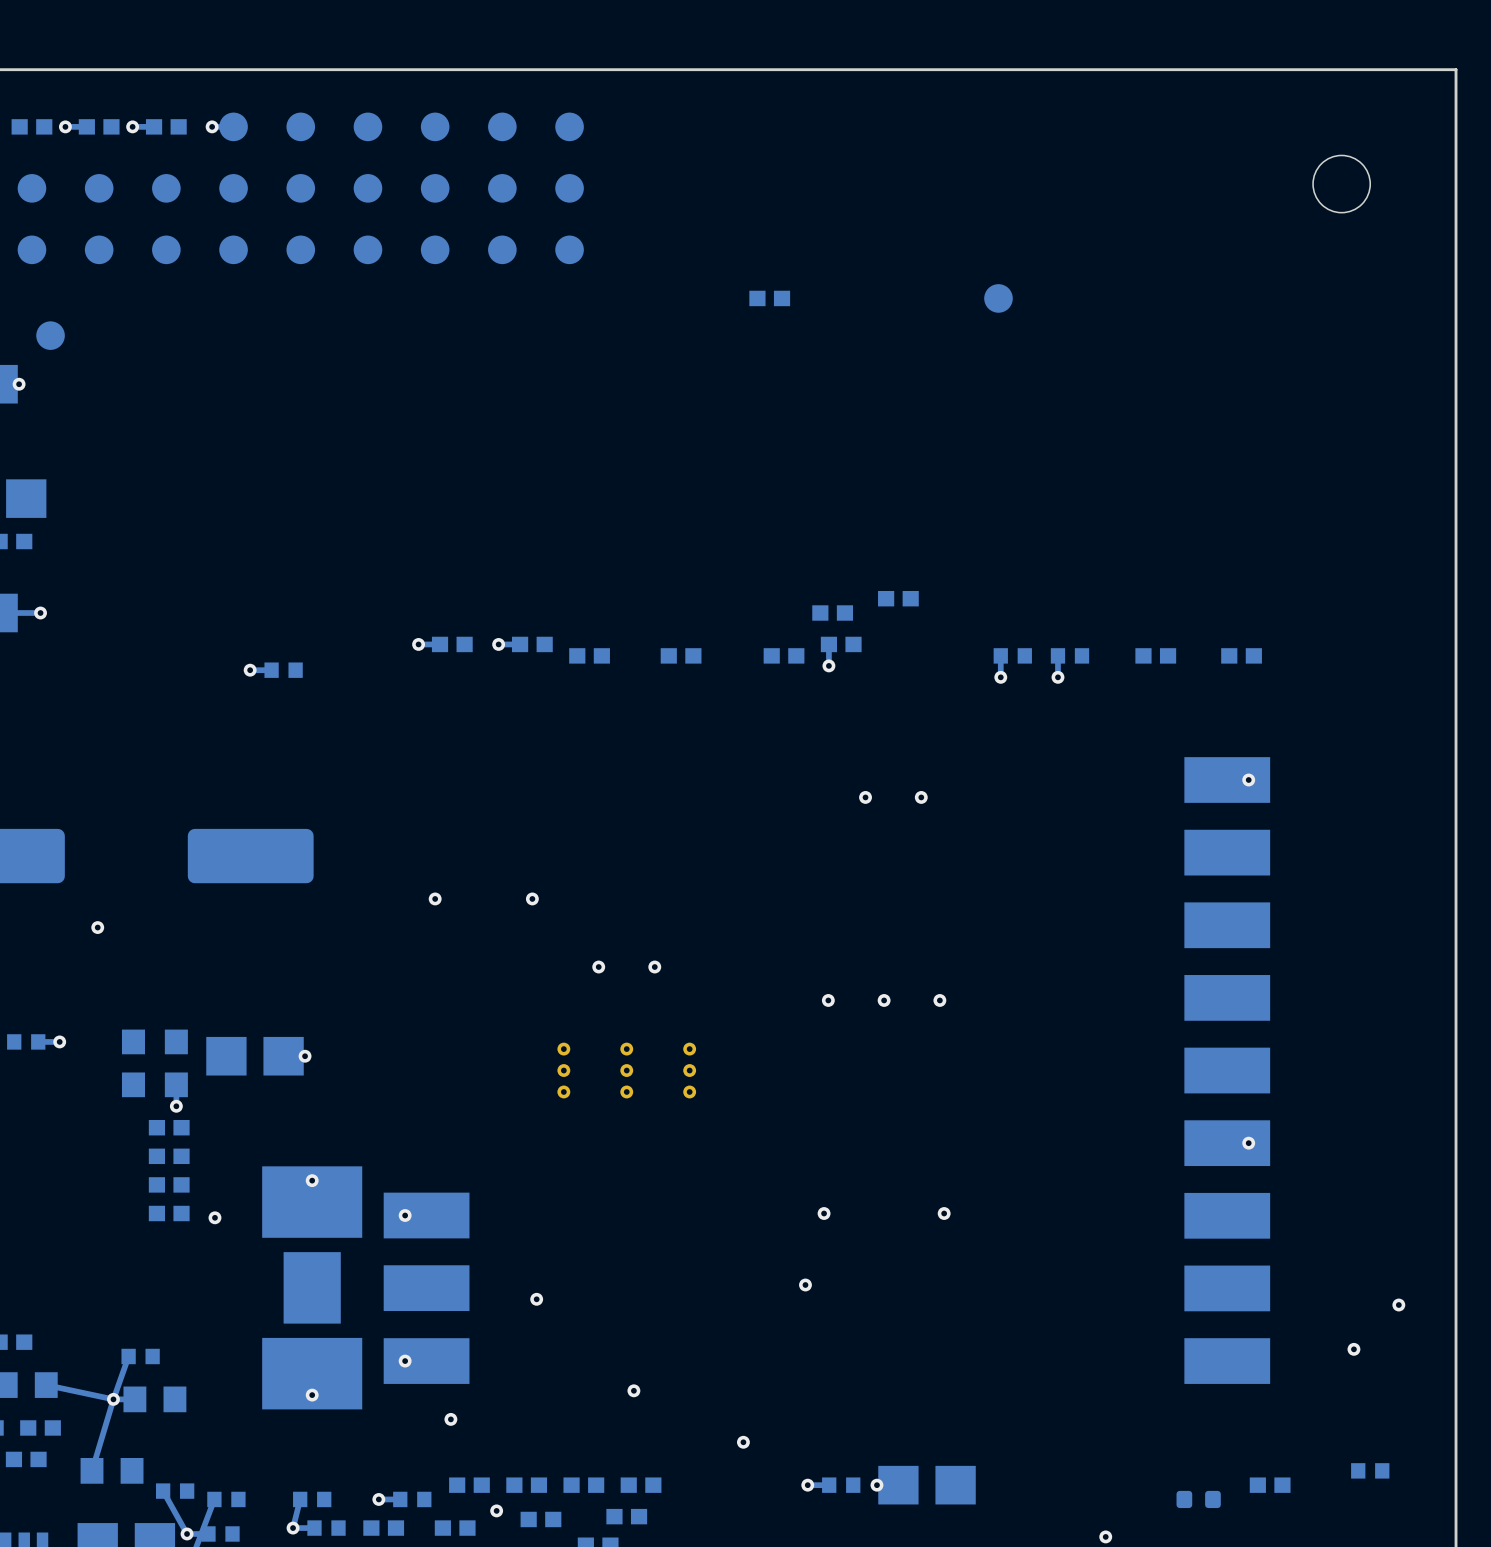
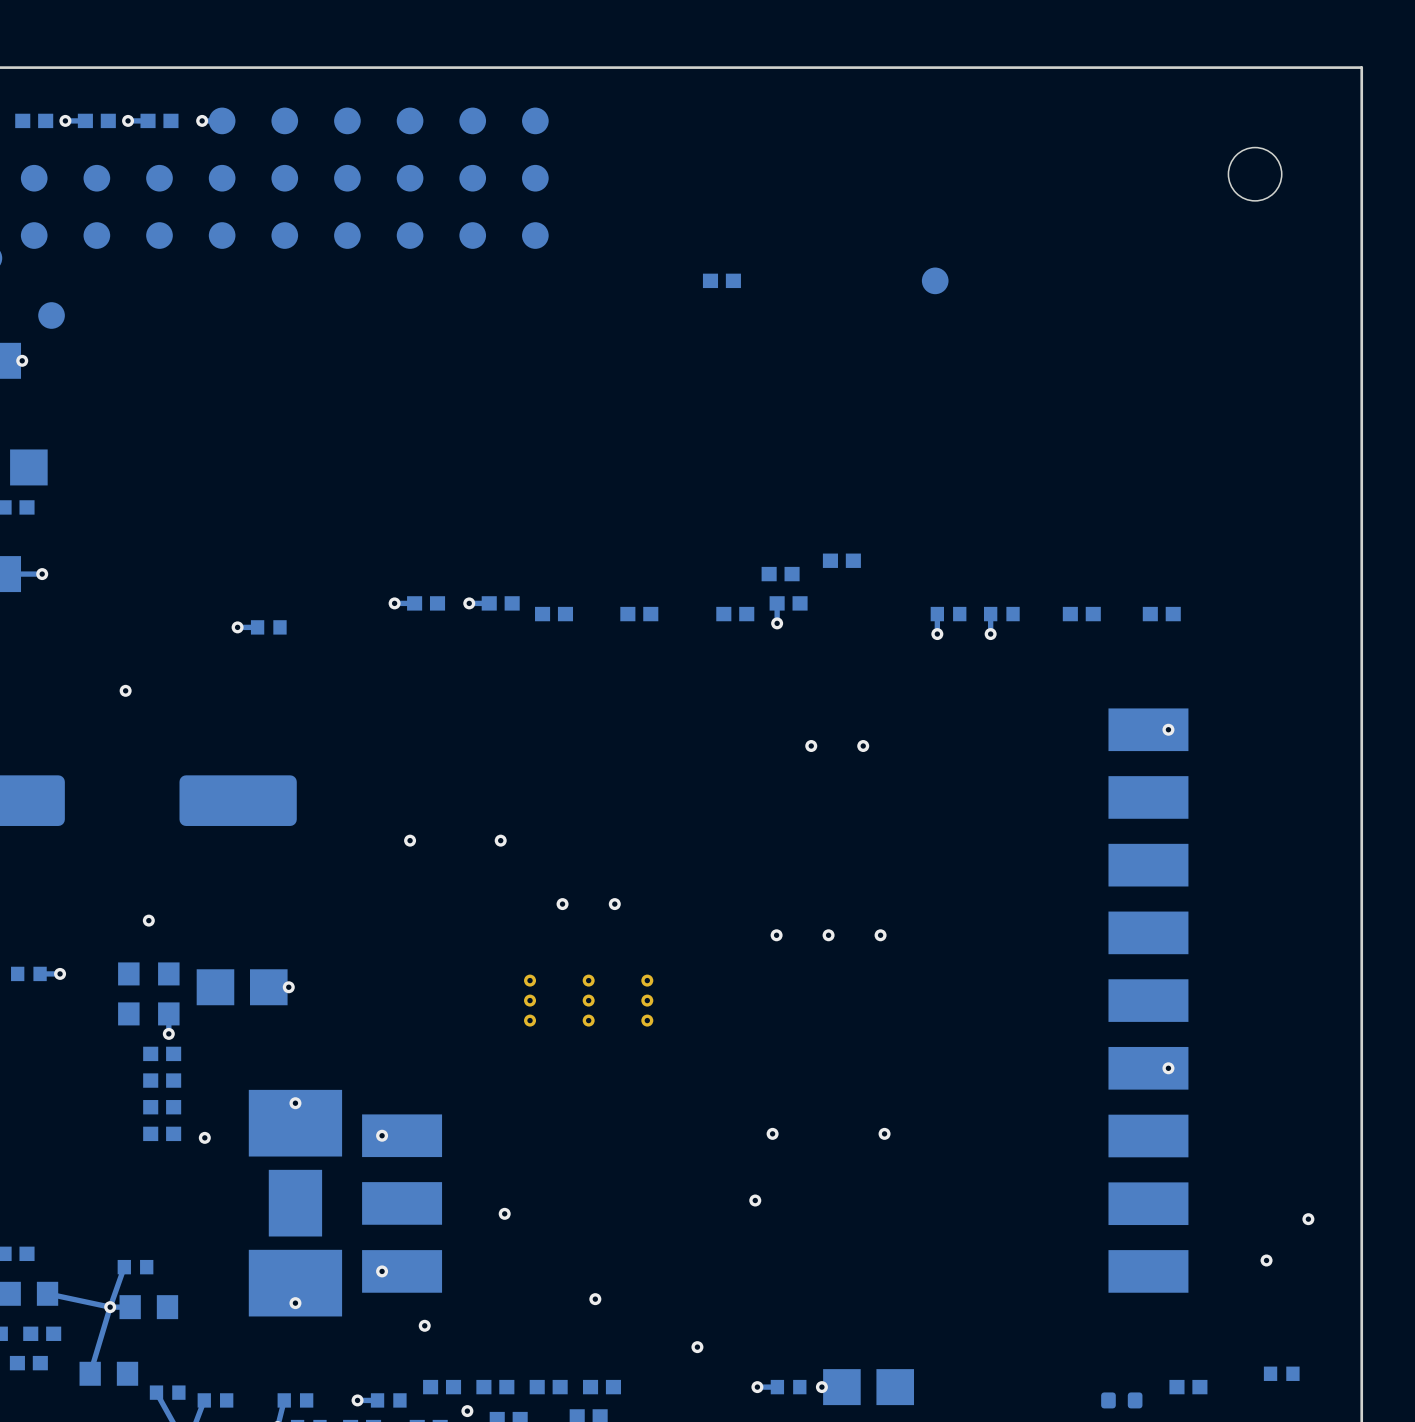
via: none -> (125, 690)
via position: (97, 927) -> (148, 920)

